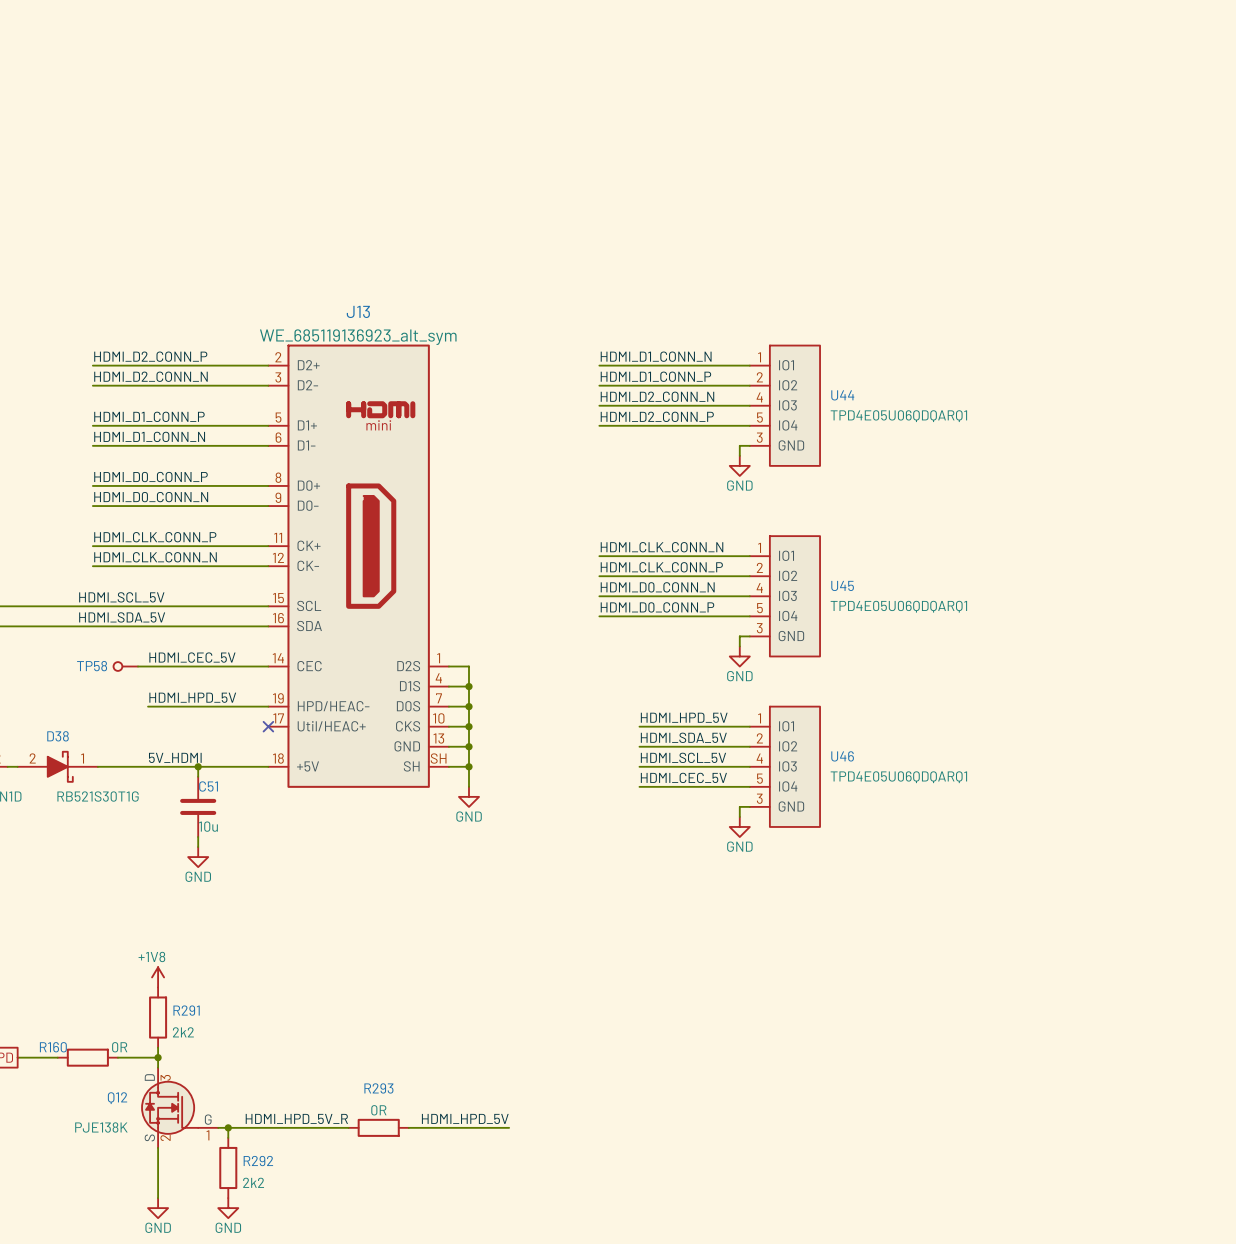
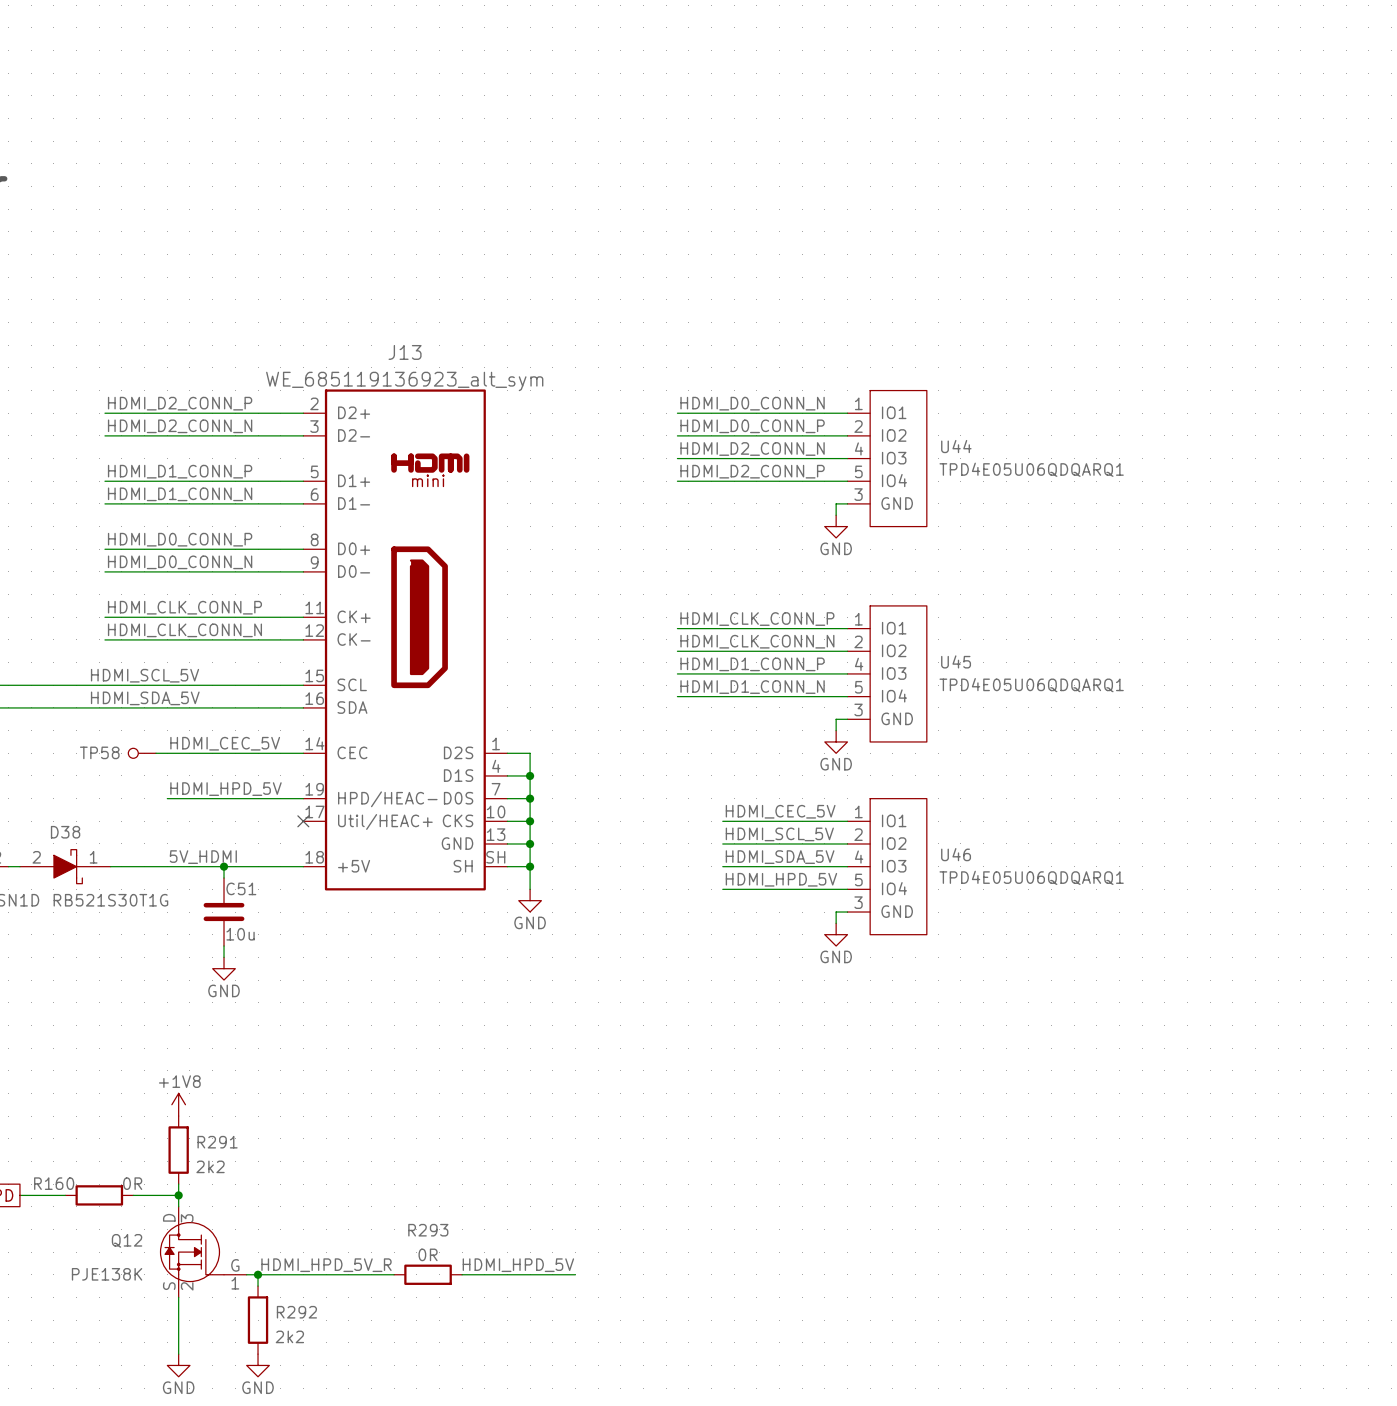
label: HDMI_D1_CONN_N (656, 356) -> HDMI_D0_CONN_N (752, 403)
label: HDMI_D1_CONN_P (655, 376) -> HDMI_D0_CONN_P (752, 426)
label: HDMI_CLK_CONN_N (662, 547) -> HDMI_CLK_CONN_P (757, 619)
label: HDMI_CLK_CONN_P (661, 567) -> HDMI_CLK_CONN_N (757, 641)
label: HDMI_D0_CONN_N (657, 587) -> HDMI_D1_CONN_P (752, 664)
label: HDMI_D0_CONN_P (657, 607) -> HDMI_D1_CONN_N (752, 687)
label: HDMI_HPD_5V (684, 717) -> HDMI_CEC_5V (780, 811)
label: HDMI_SDA_5V (683, 737) -> HDMI_SCL_5V (779, 834)
label: HDMI_SCL_5V (683, 757) -> HDMI_SDA_5V (780, 857)
label: HDMI_CEC_5V (683, 777) -> HDMI_HPD_5V (781, 879)

